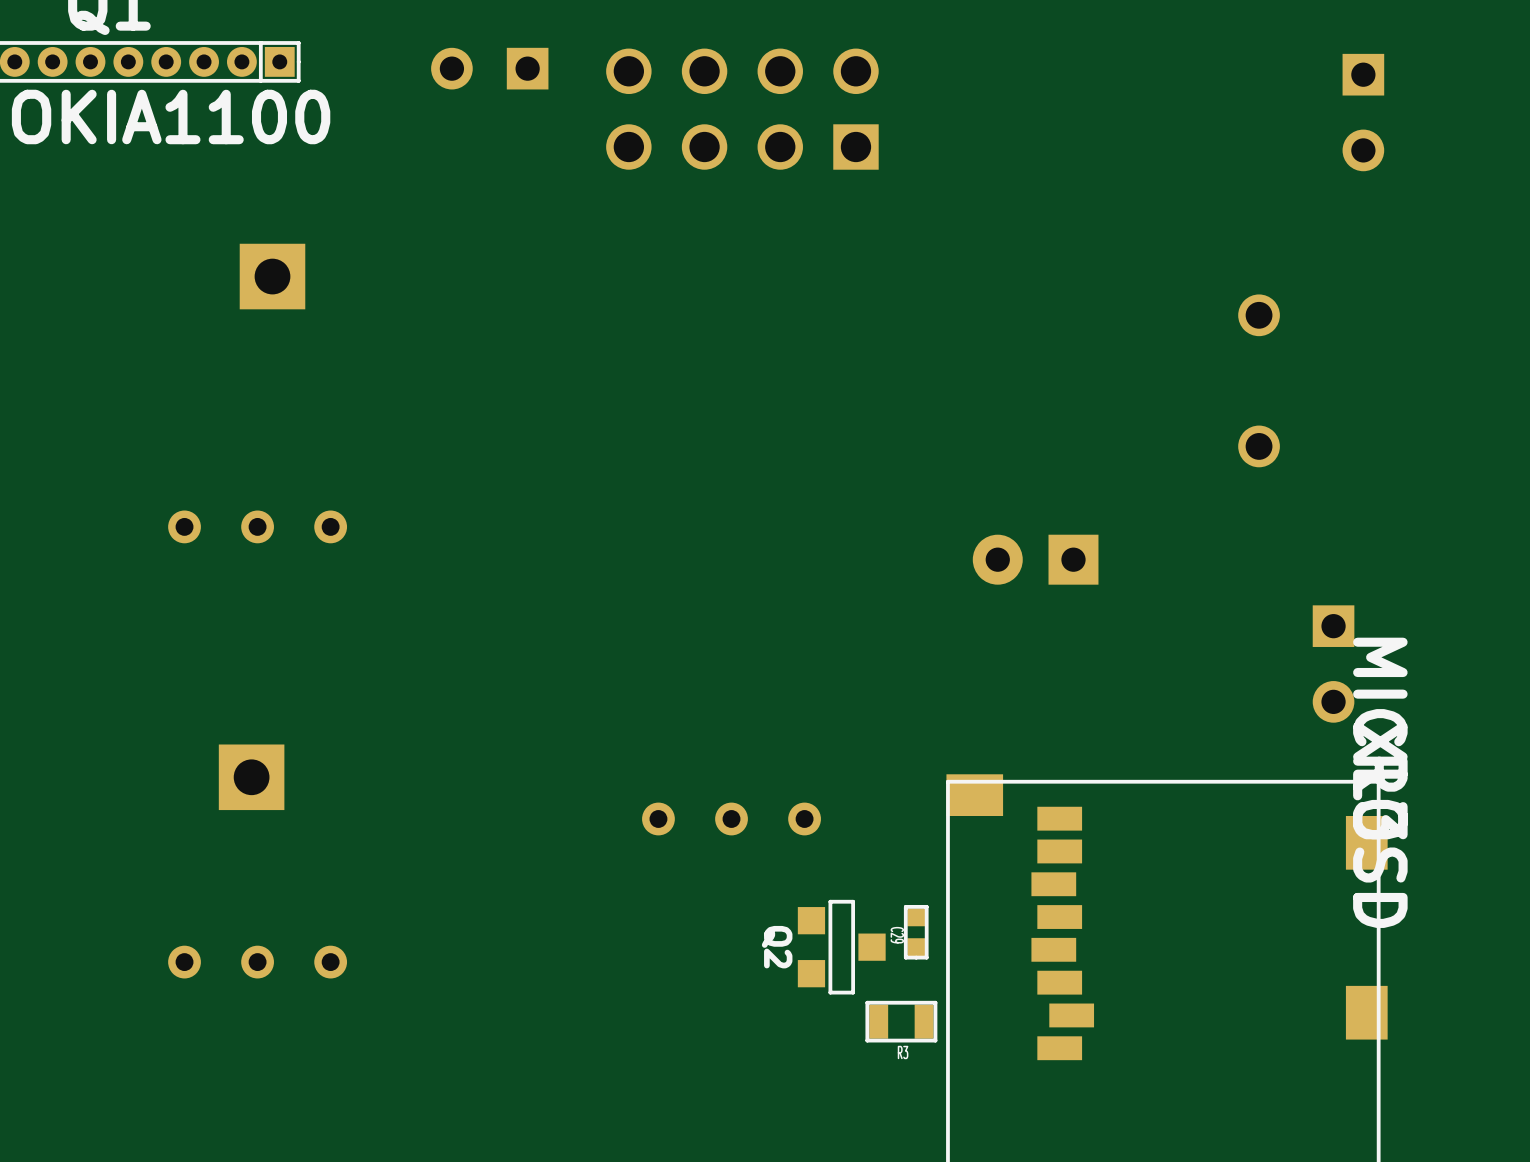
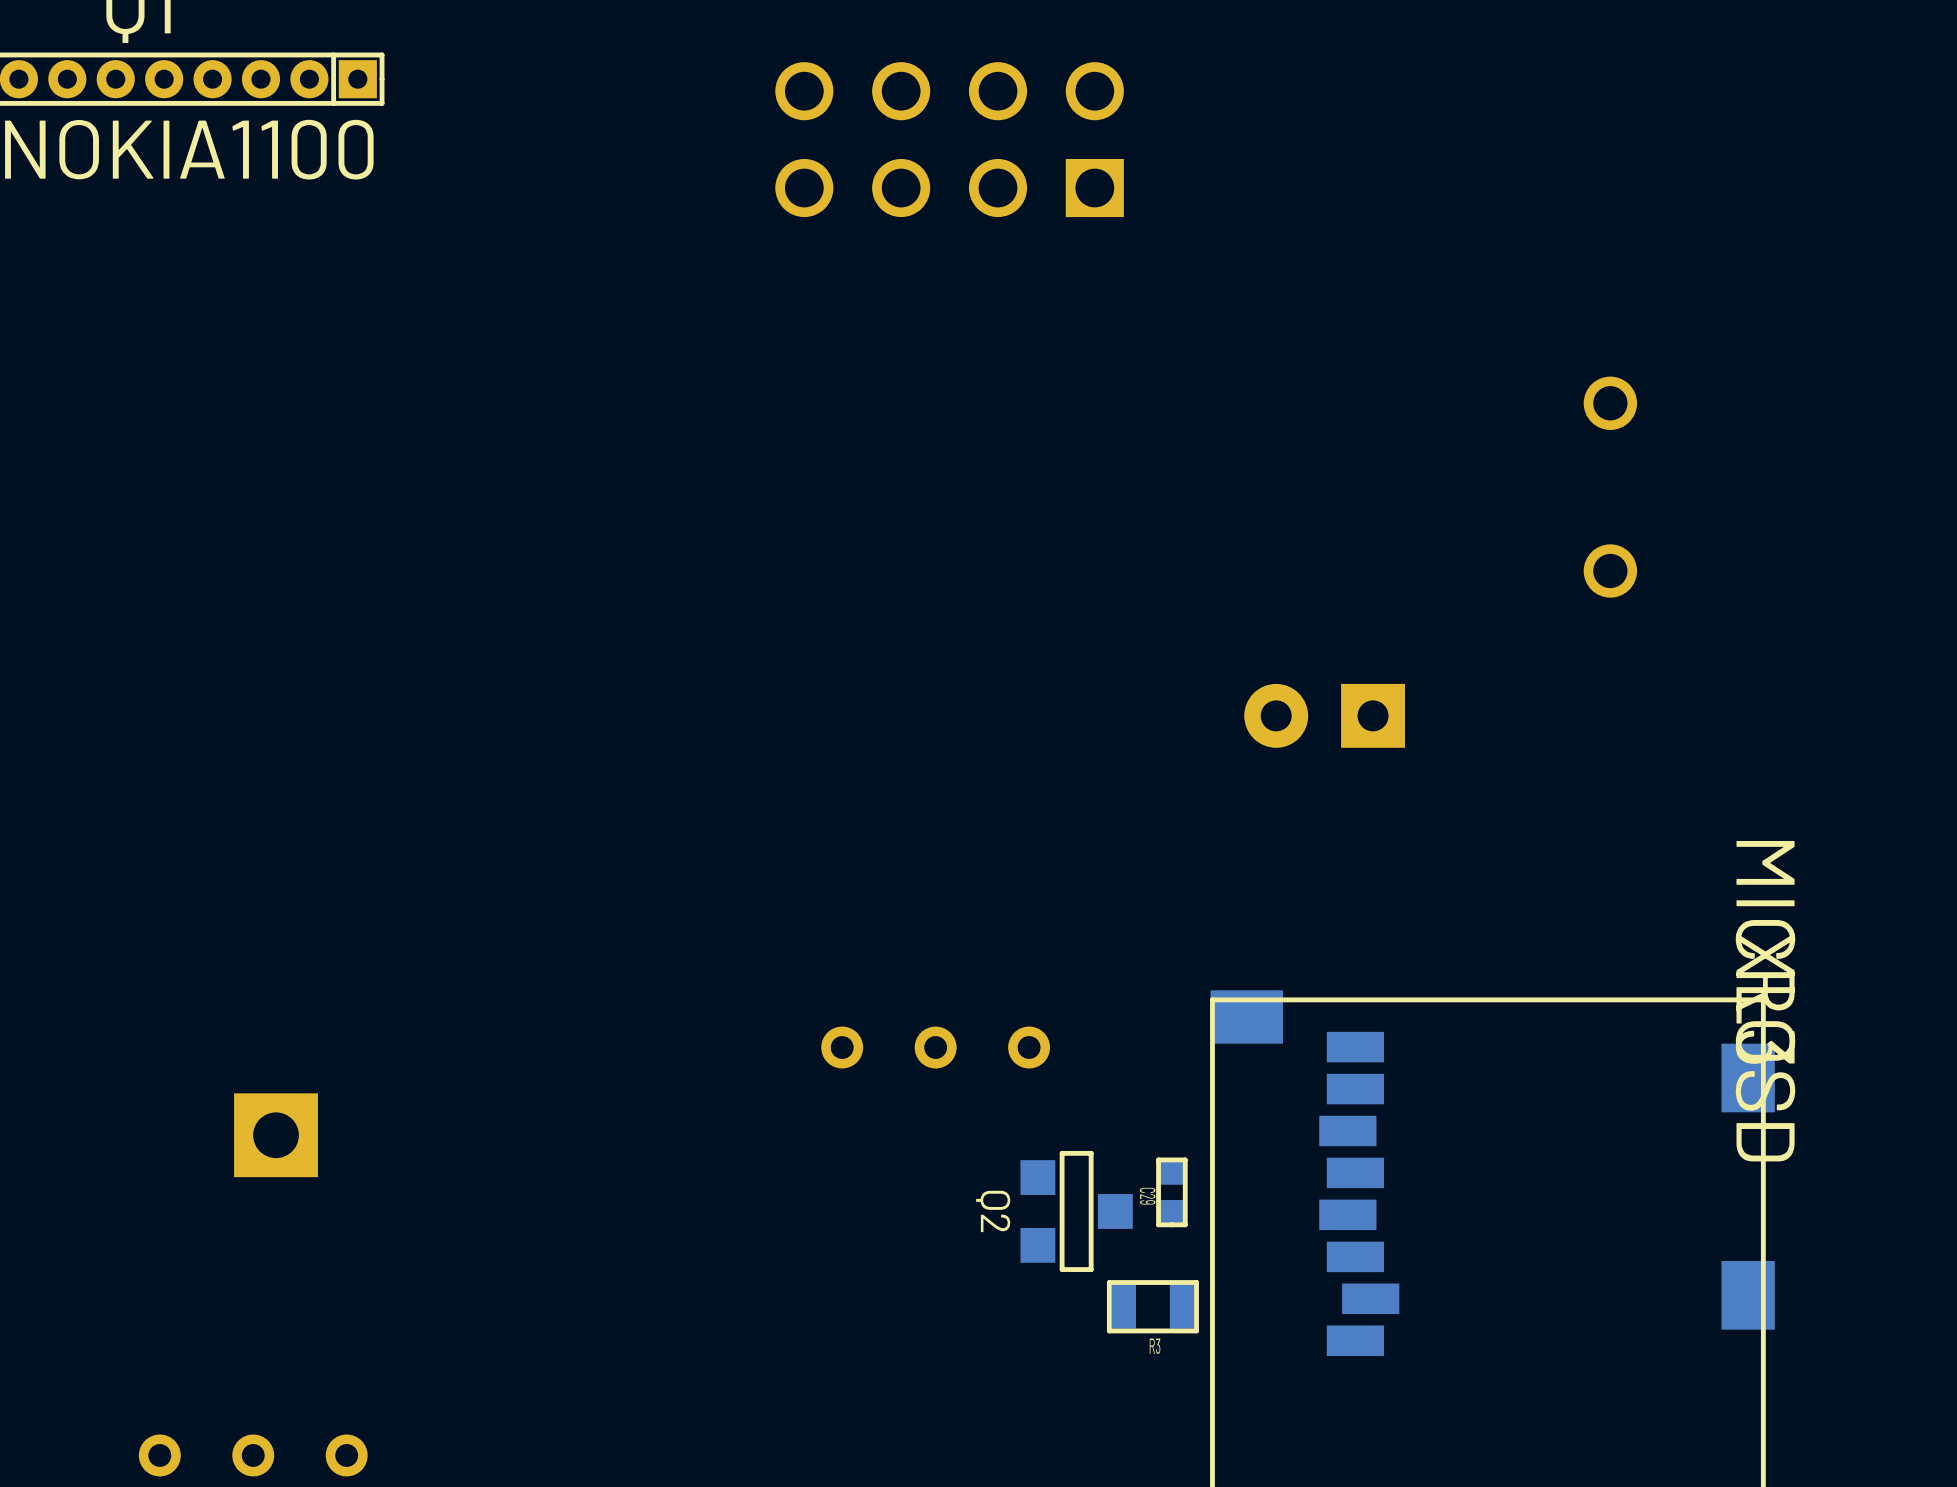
part: (489, 68) -> none
part: (1363, 112) -> none
part: (272, 276) -> none
part: (257, 526) -> none
part: (1333, 664) -> none
part position: (251, 777) -> (276, 1135)
part position: (257, 962) -> (253, 1455)

